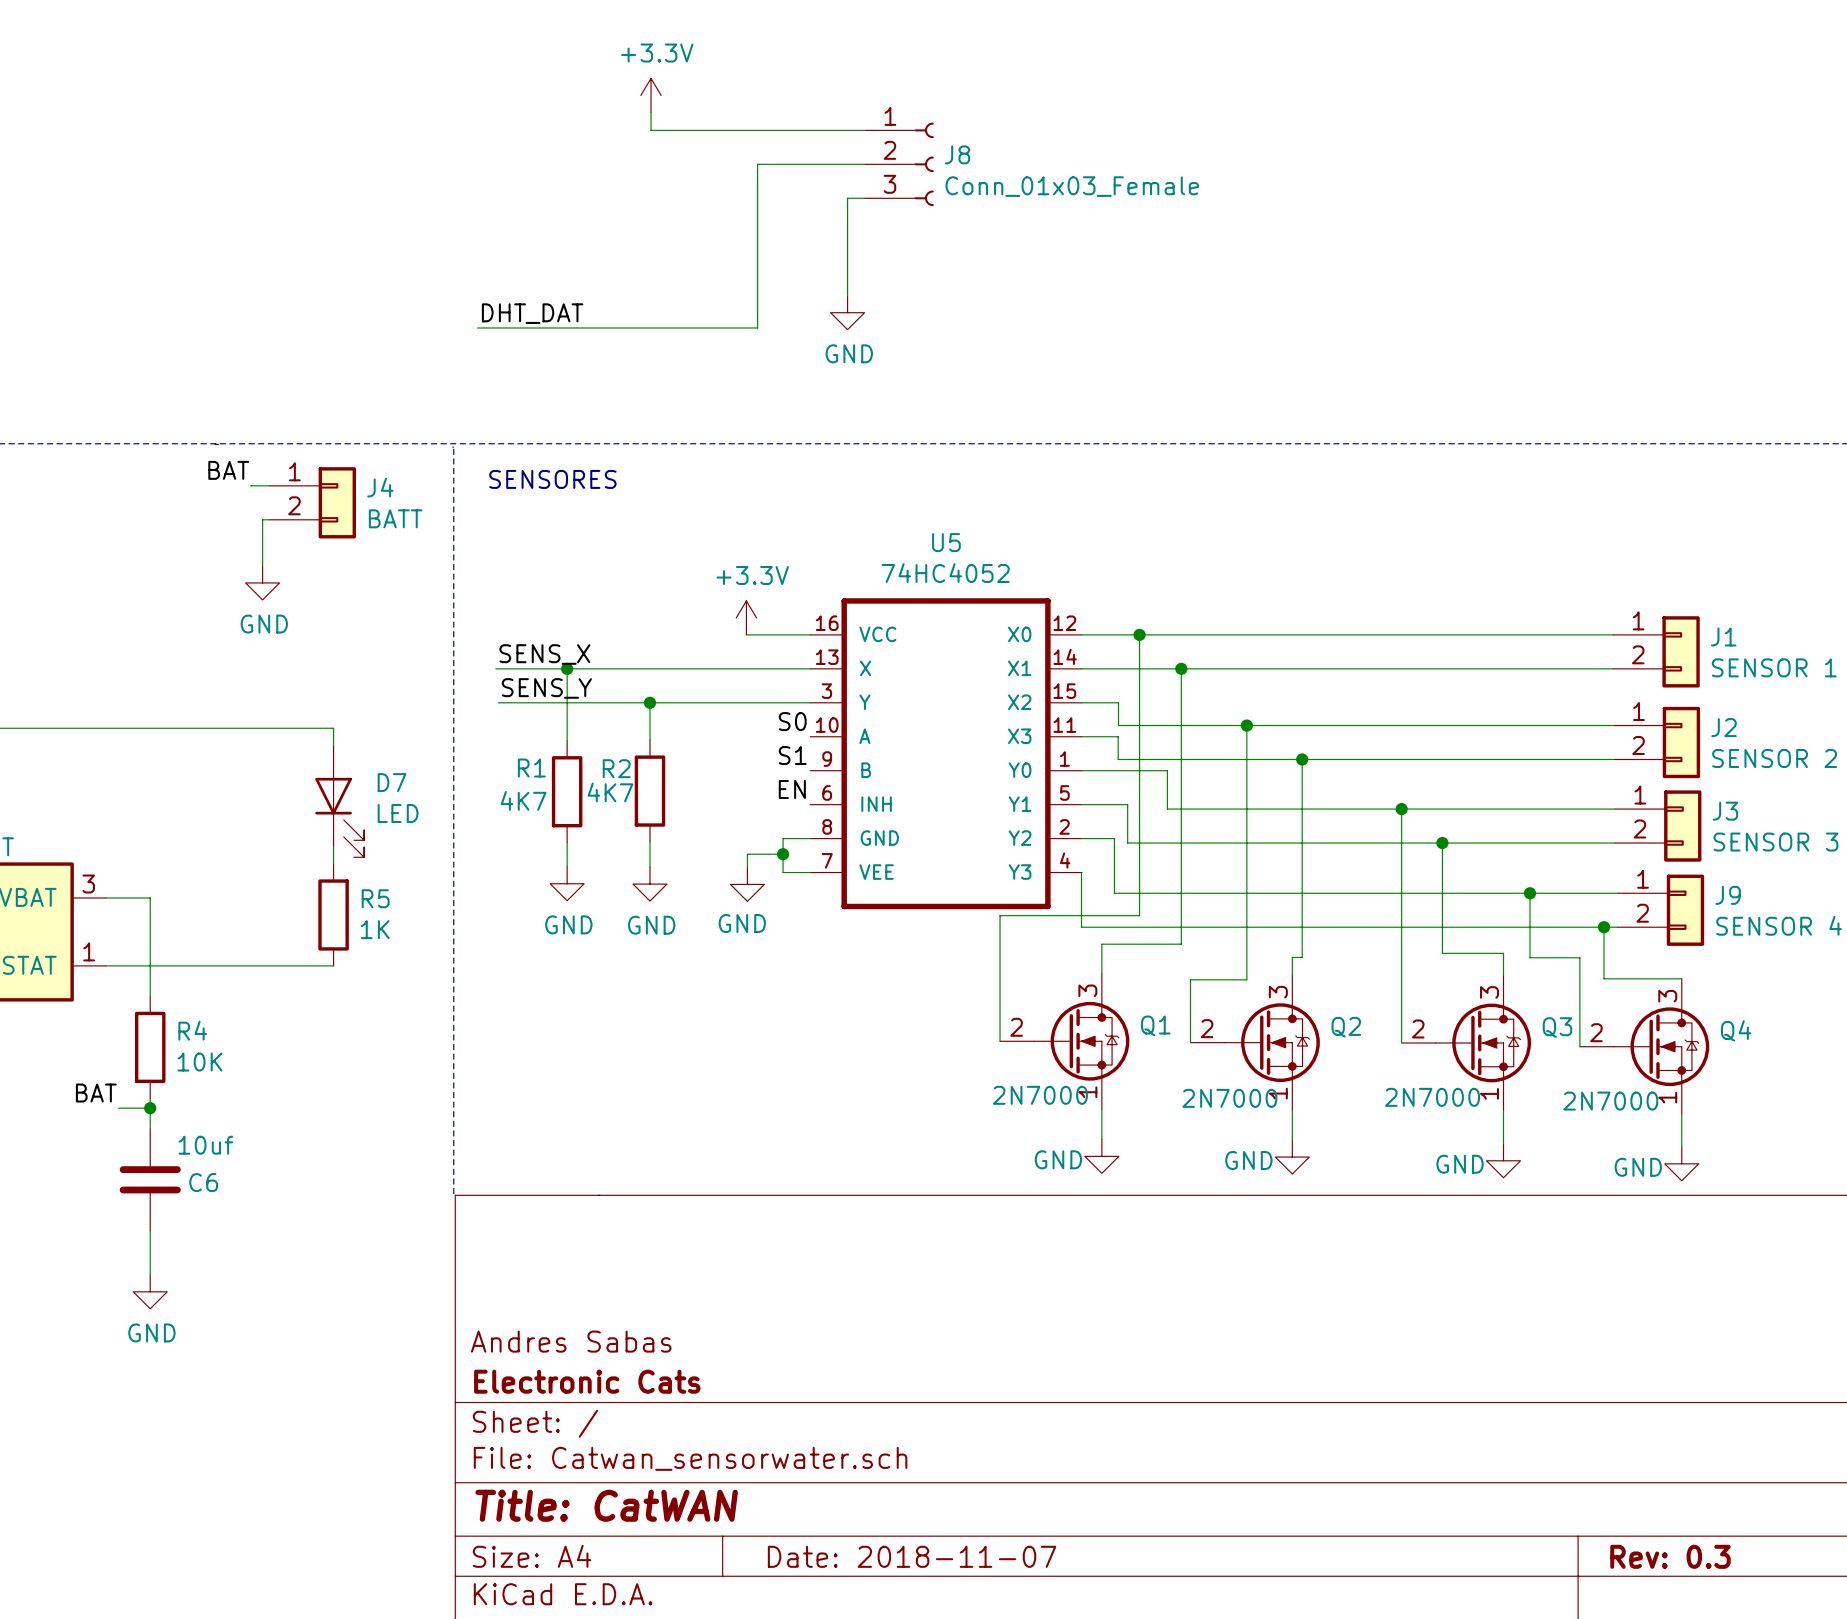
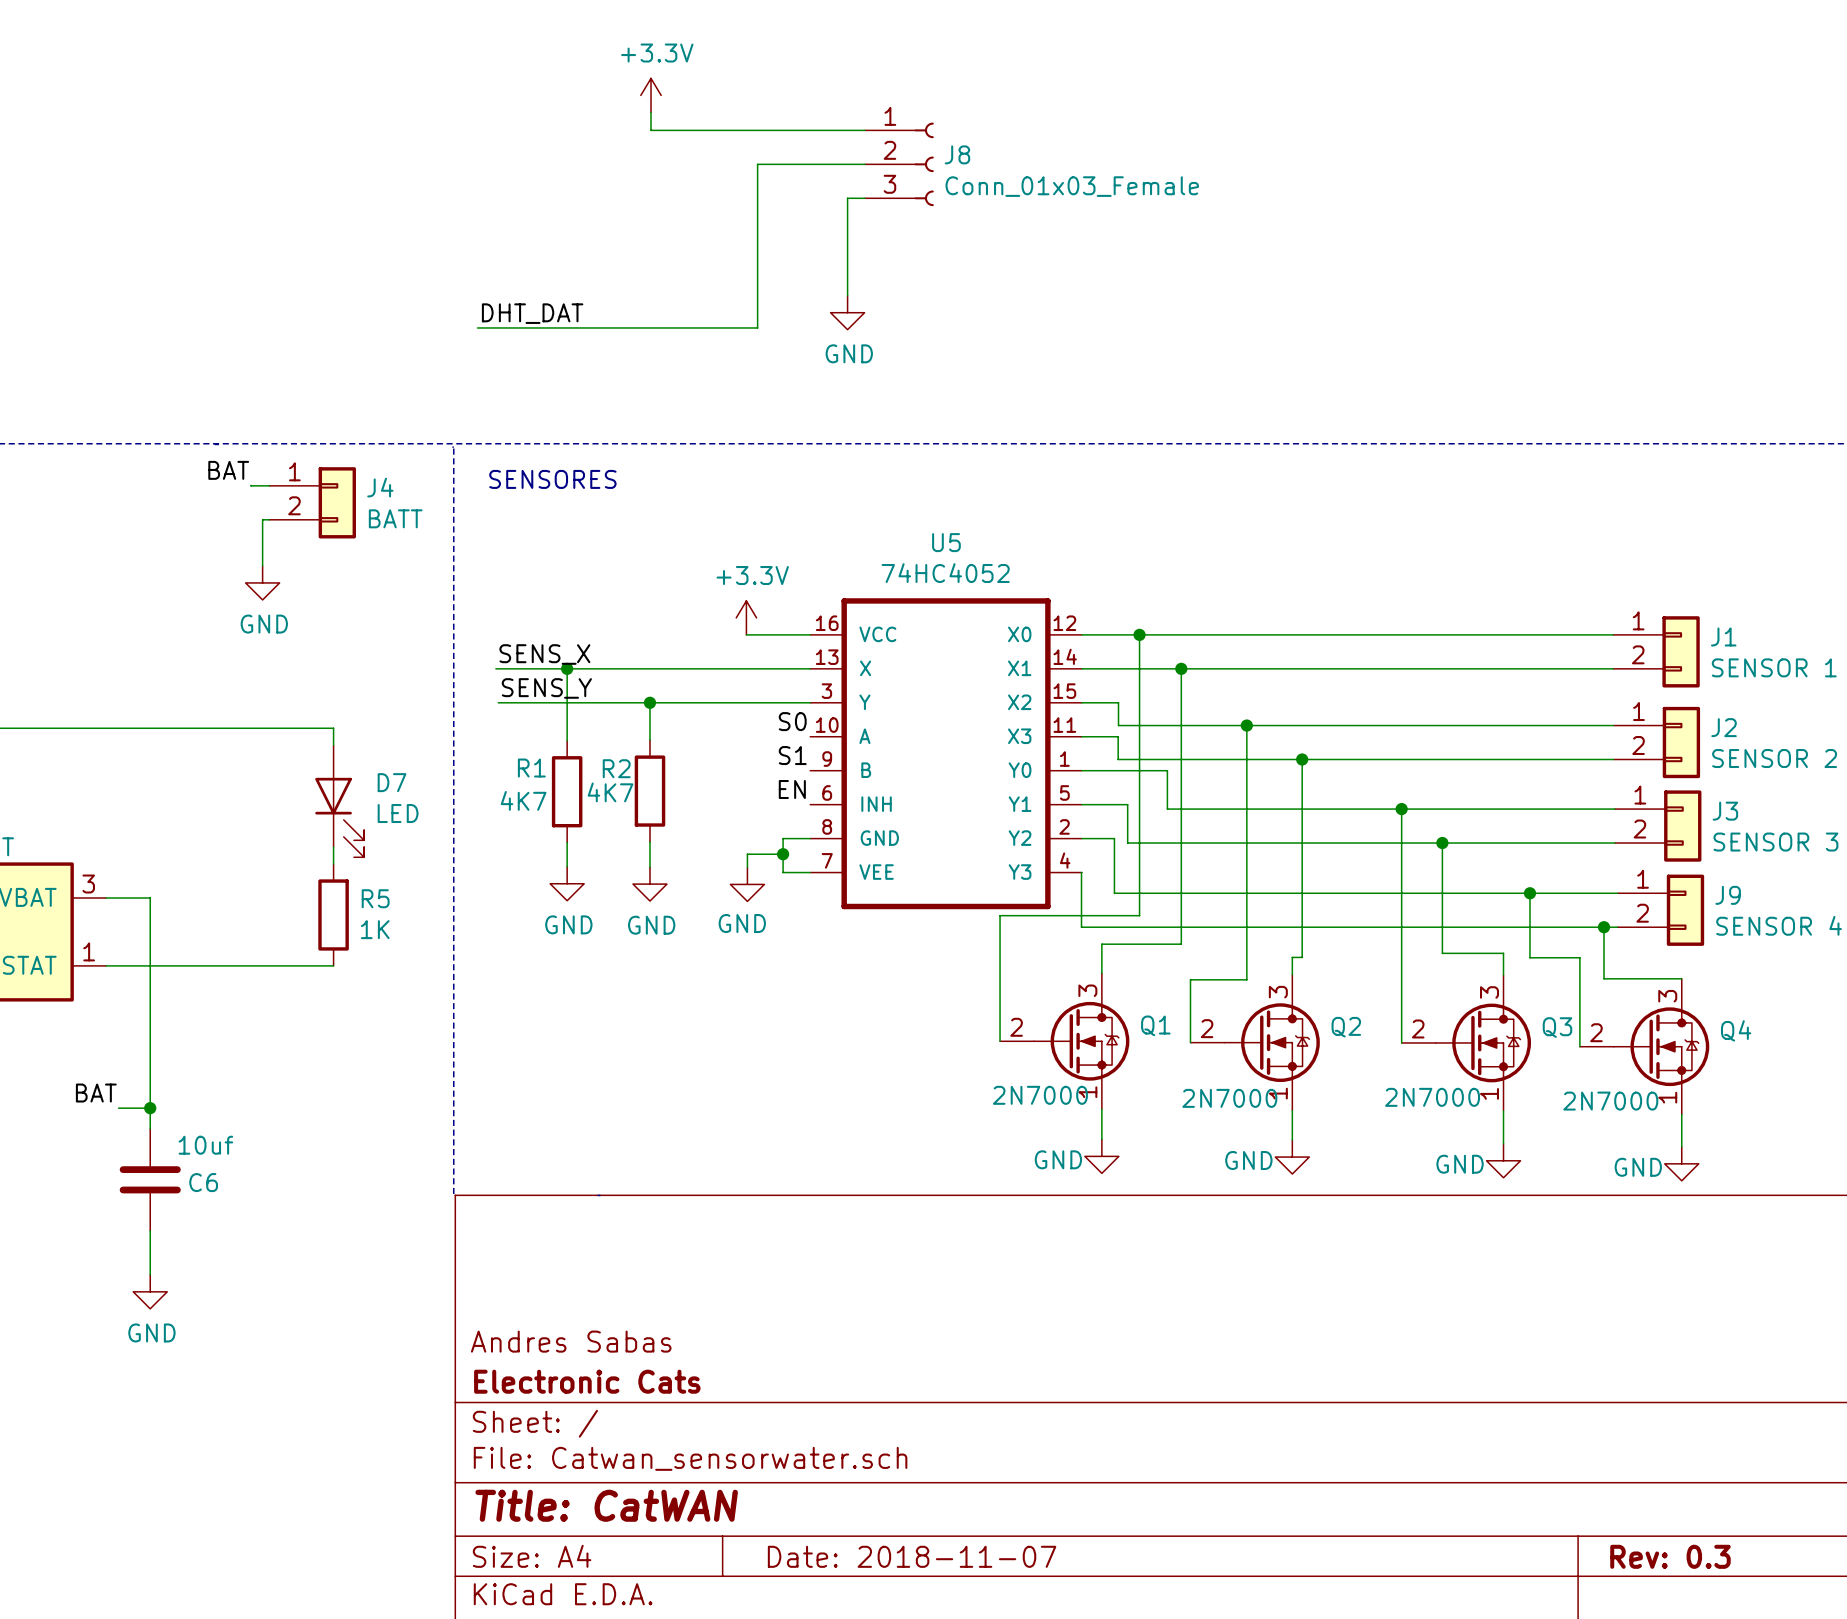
wire: none -> (150, 996) (150, 1098)
R4: 10K (150, 1047) -> none

